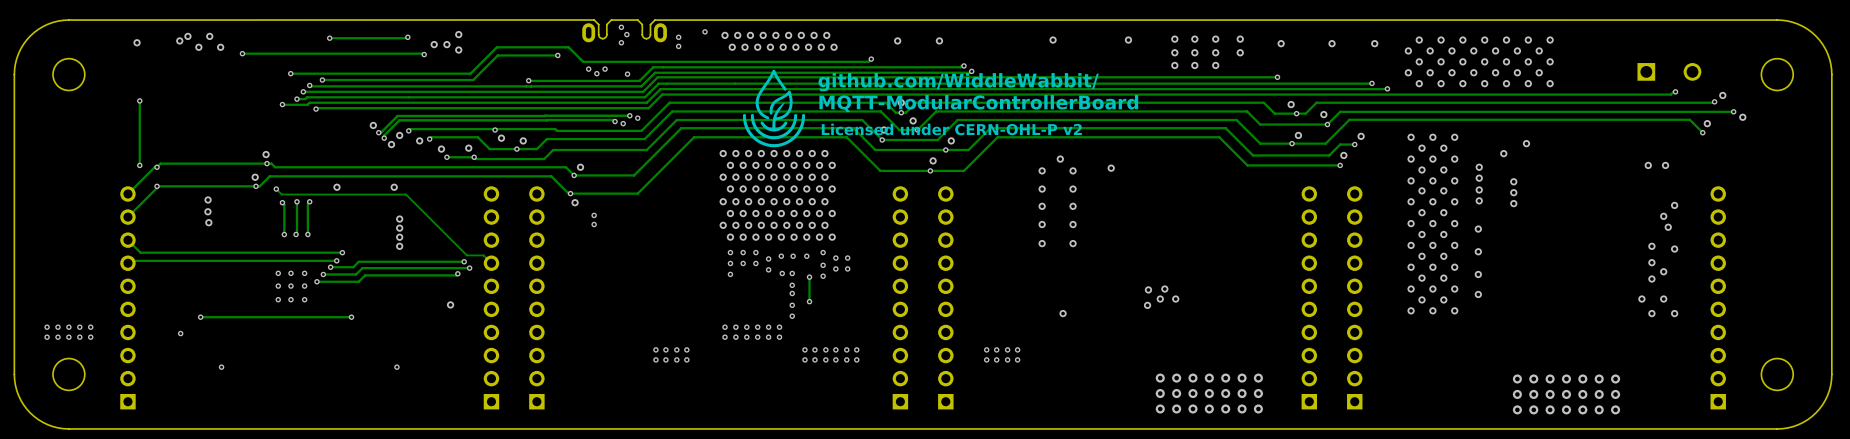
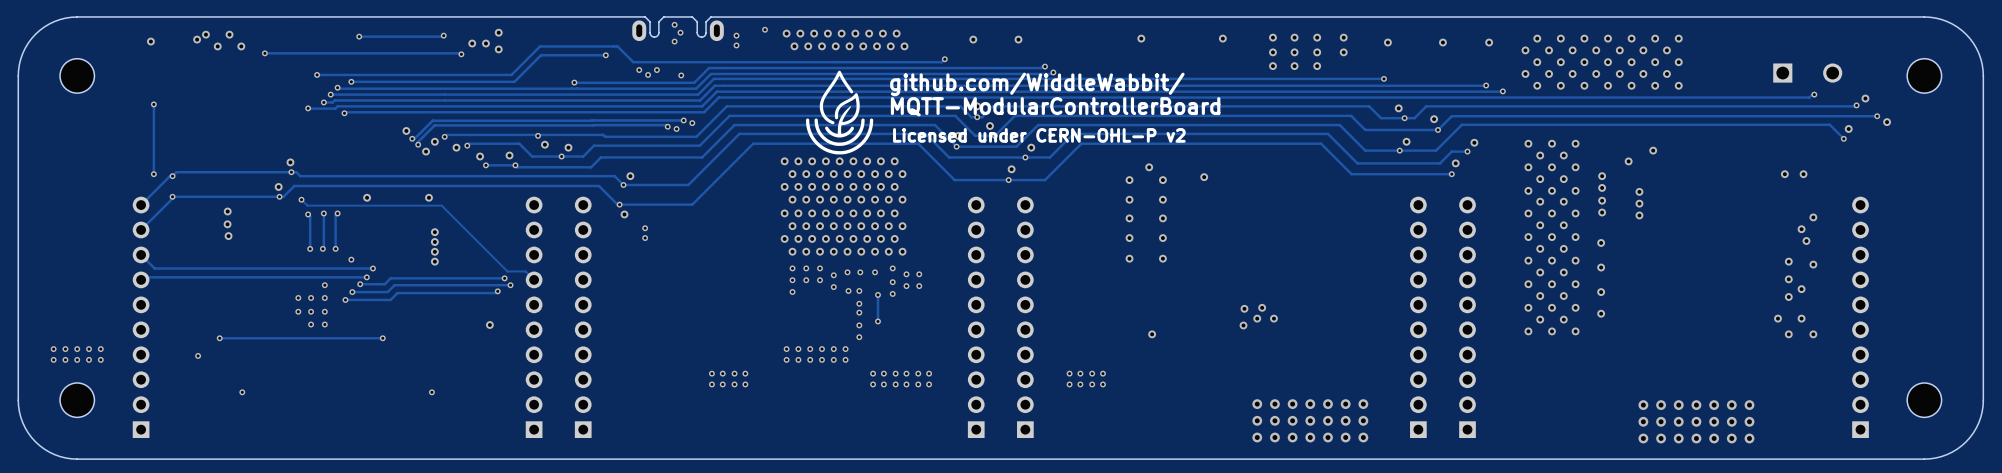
via: none -> (351, 259)
via: none -> (324, 285)
via: (278, 273) -> none
via: (290, 273) -> none
via: (304, 273) -> none
via: none -> (298, 297)
via: none -> (311, 297)
via: none -> (324, 297)
via: (278, 286) -> none
via: (290, 286) -> none
via: (304, 286) -> none
via: none -> (298, 311)
via: none -> (311, 311)
via: none -> (324, 311)
via: (278, 299) -> none
via: (290, 299) -> none
via: (304, 299) -> none
via: none -> (311, 324)
via: none -> (324, 324)

